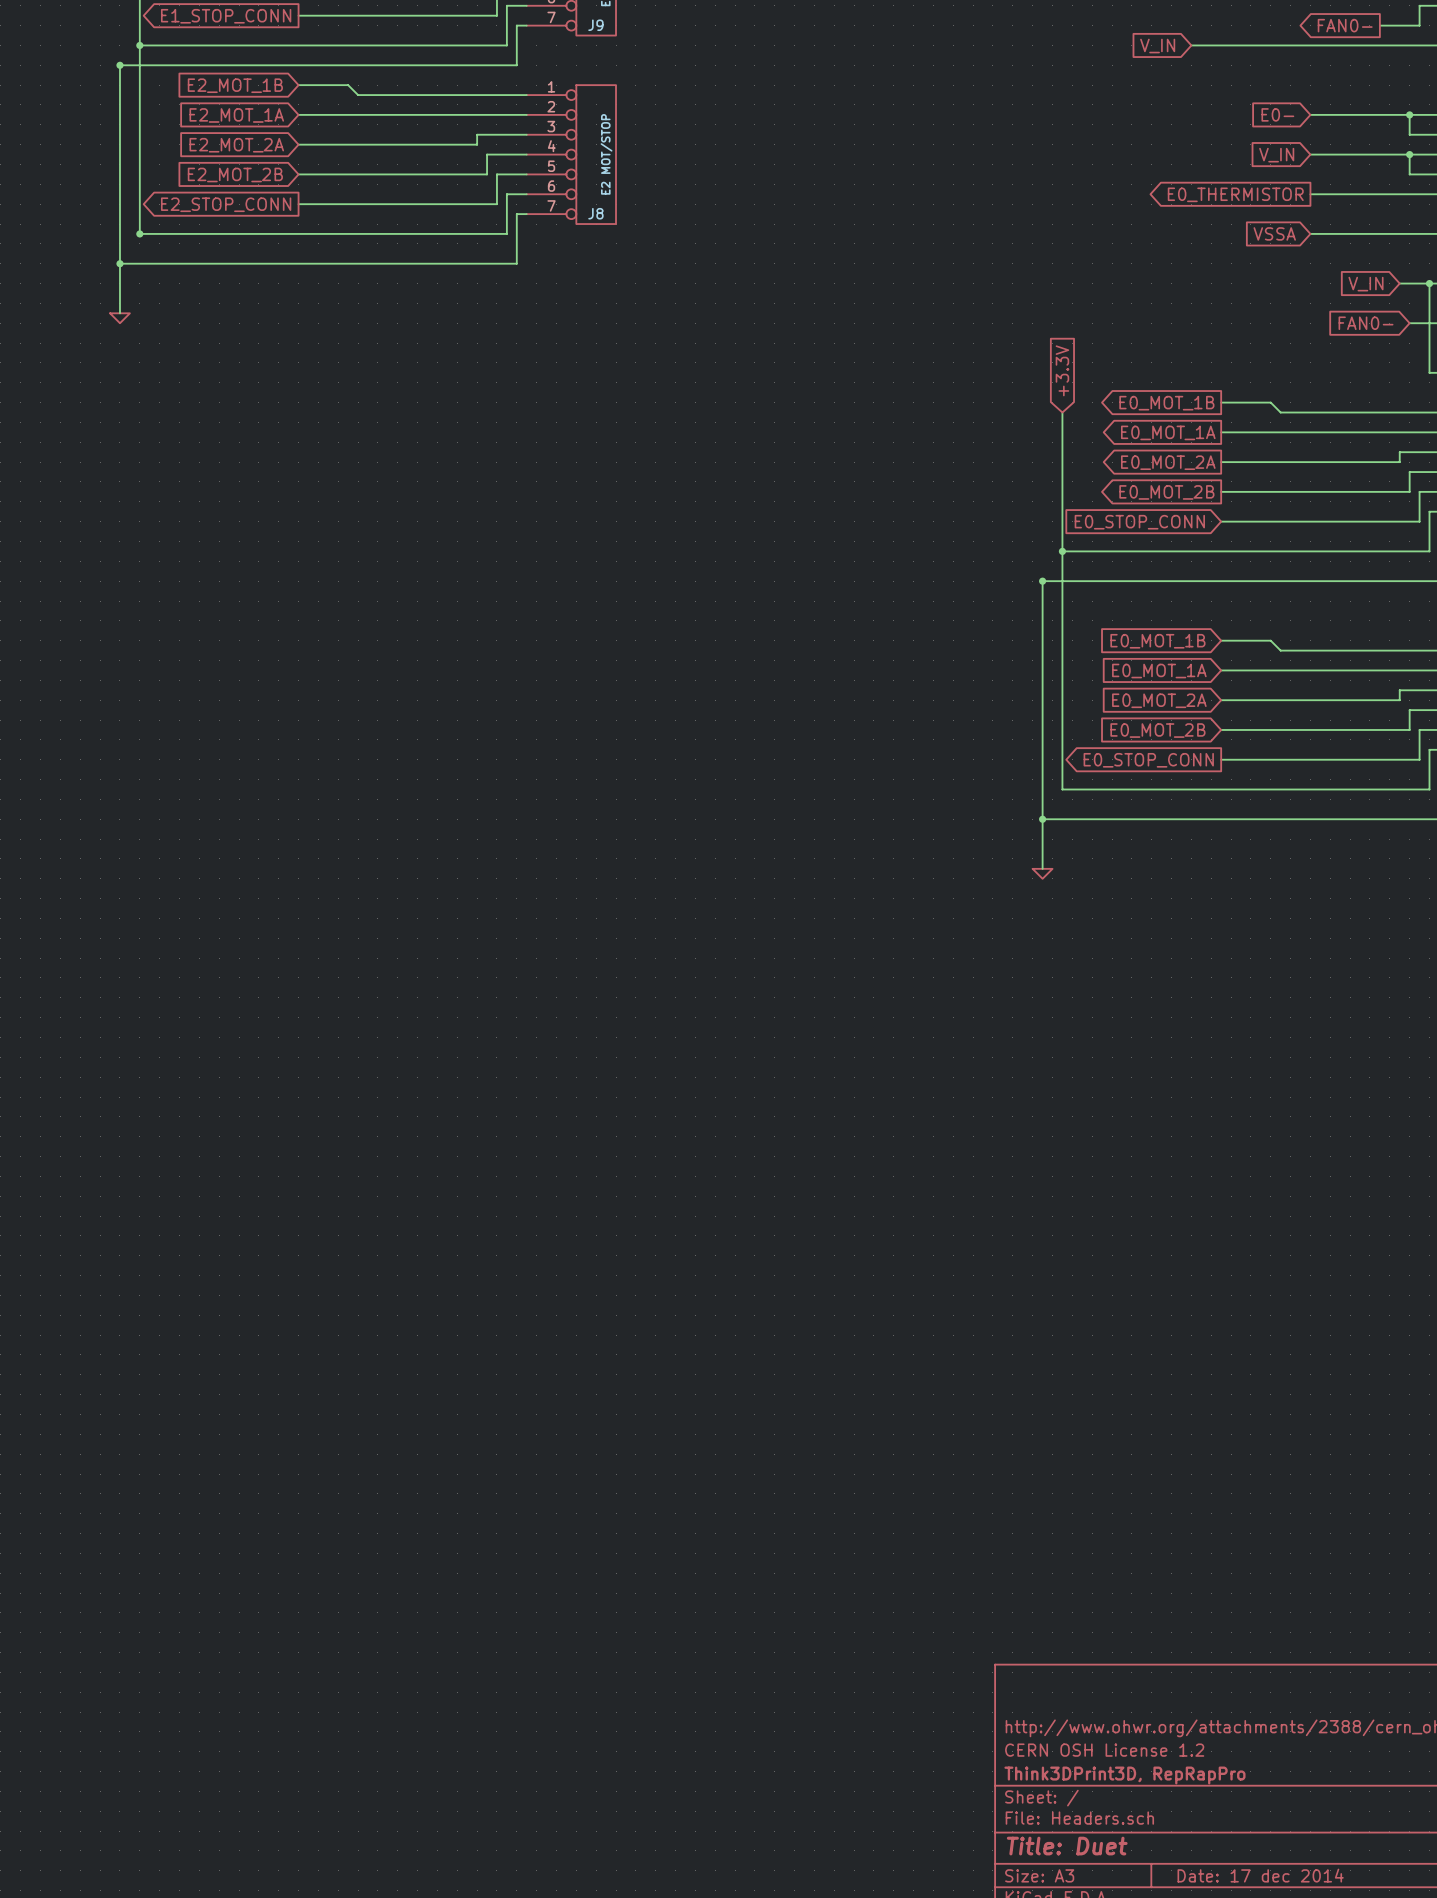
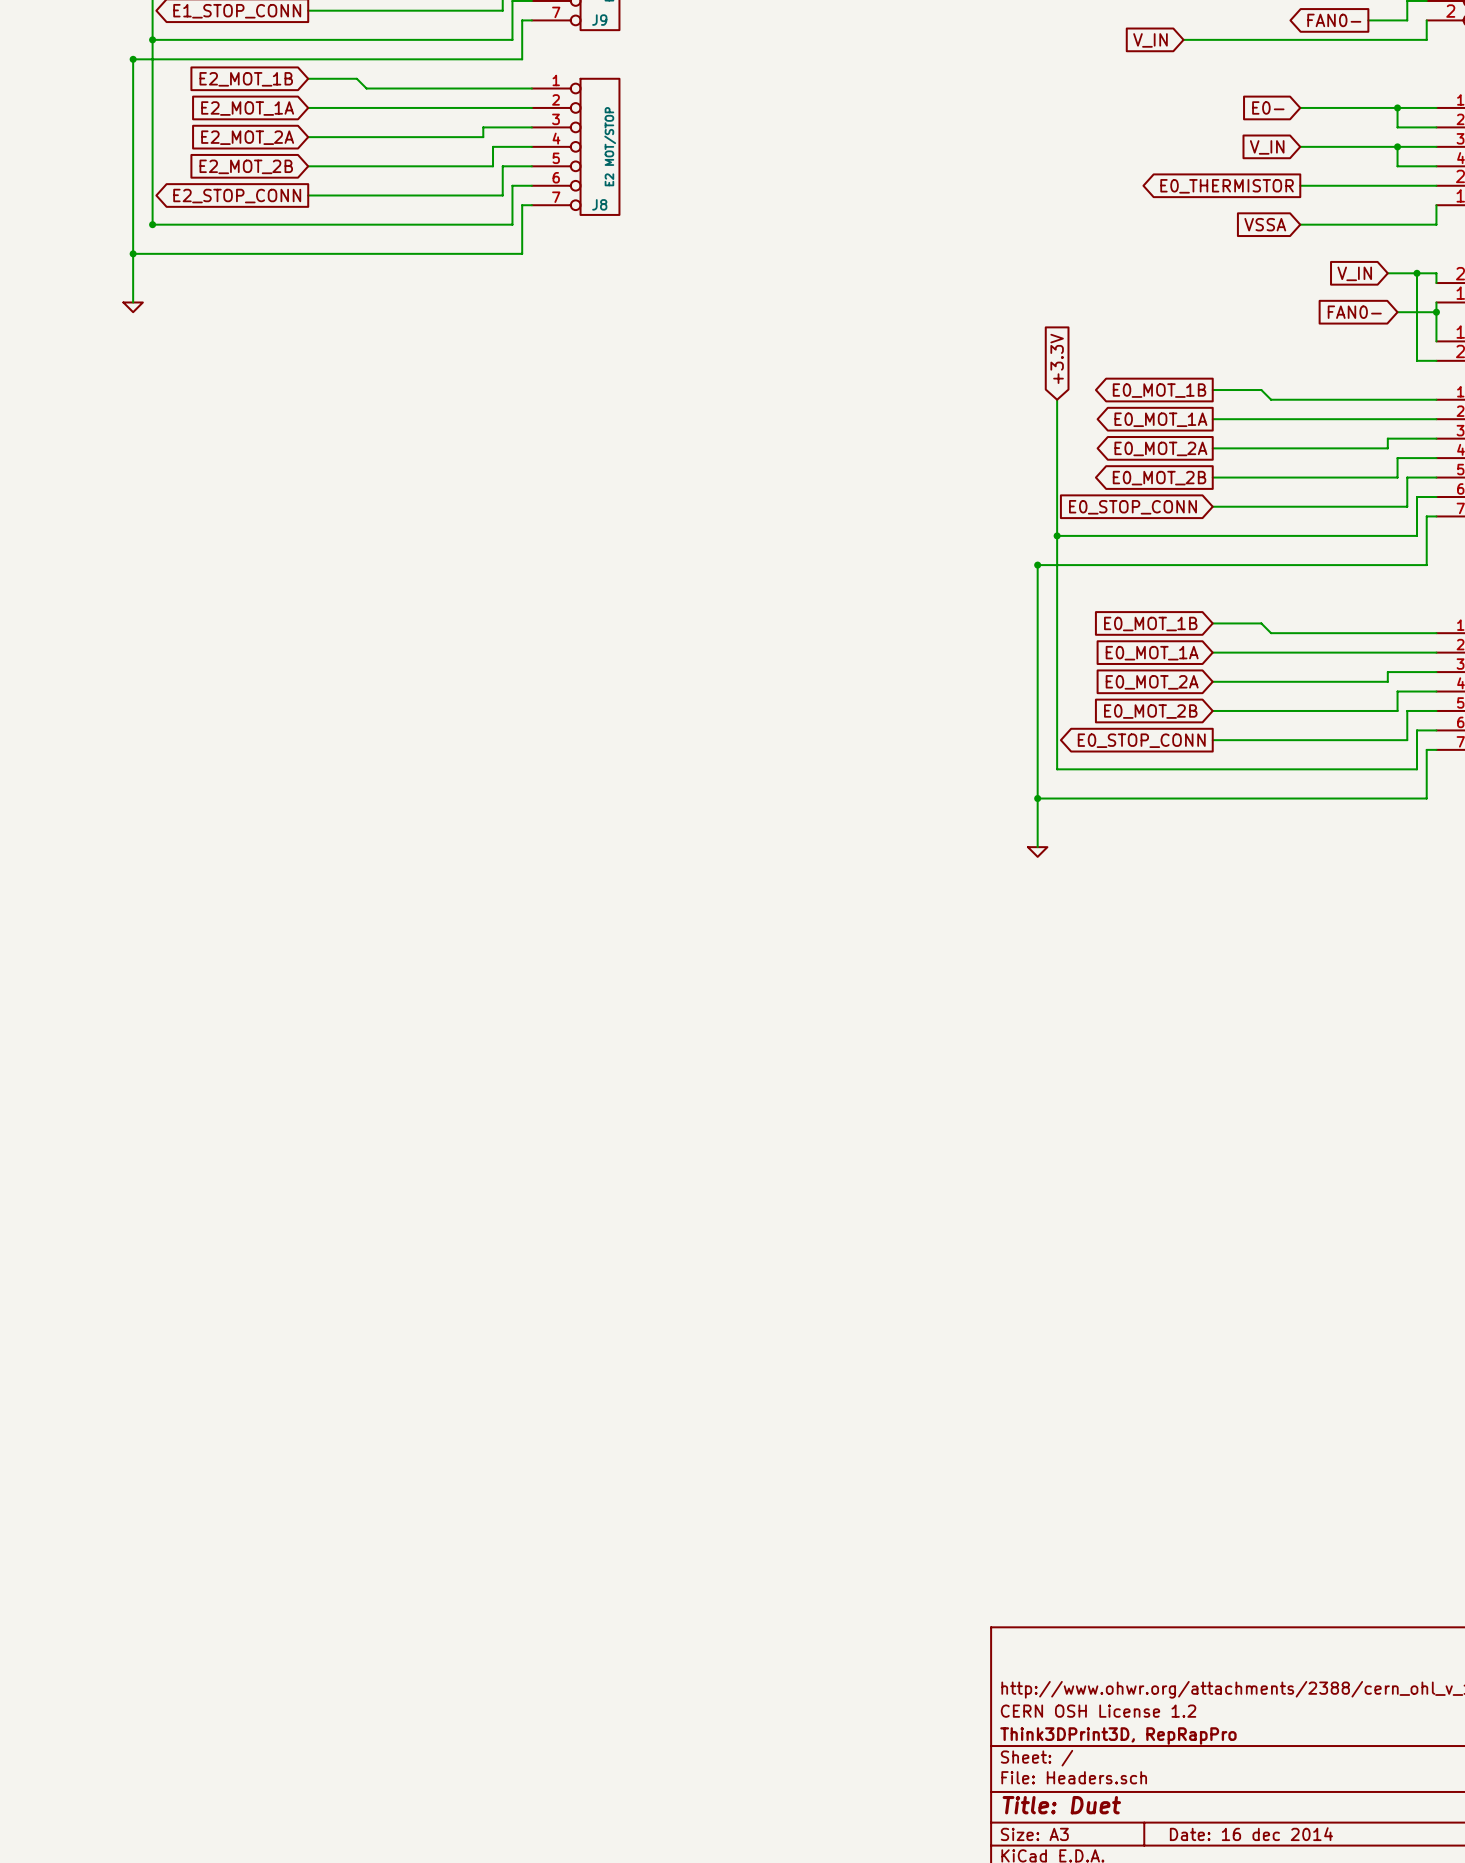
title block: Date: 17 dec 2014 (1260, 1875) -> Date: 16 dec 2014 (1251, 1834)

